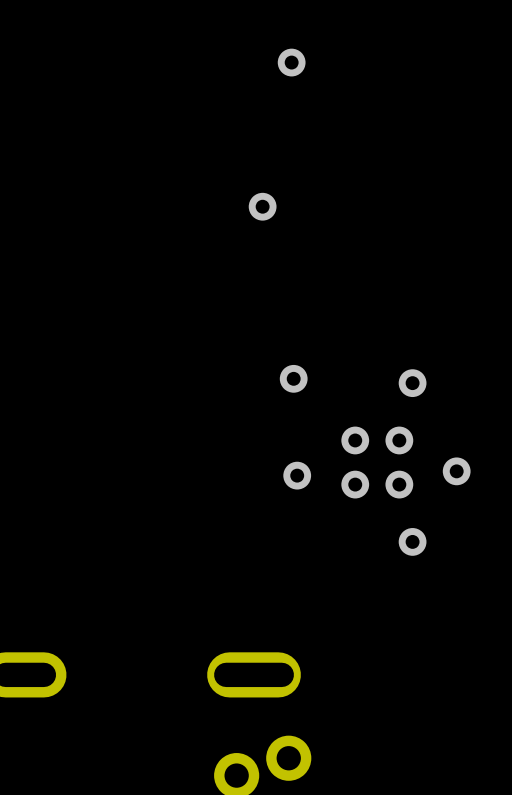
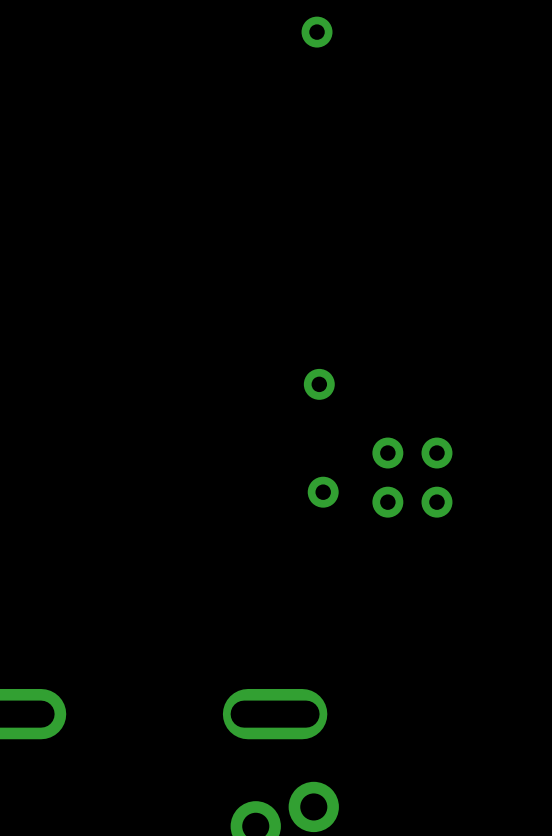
via: (262, 206) -> none
via: (412, 383) -> none
via: (456, 471) -> none
via: (412, 541) -> none

